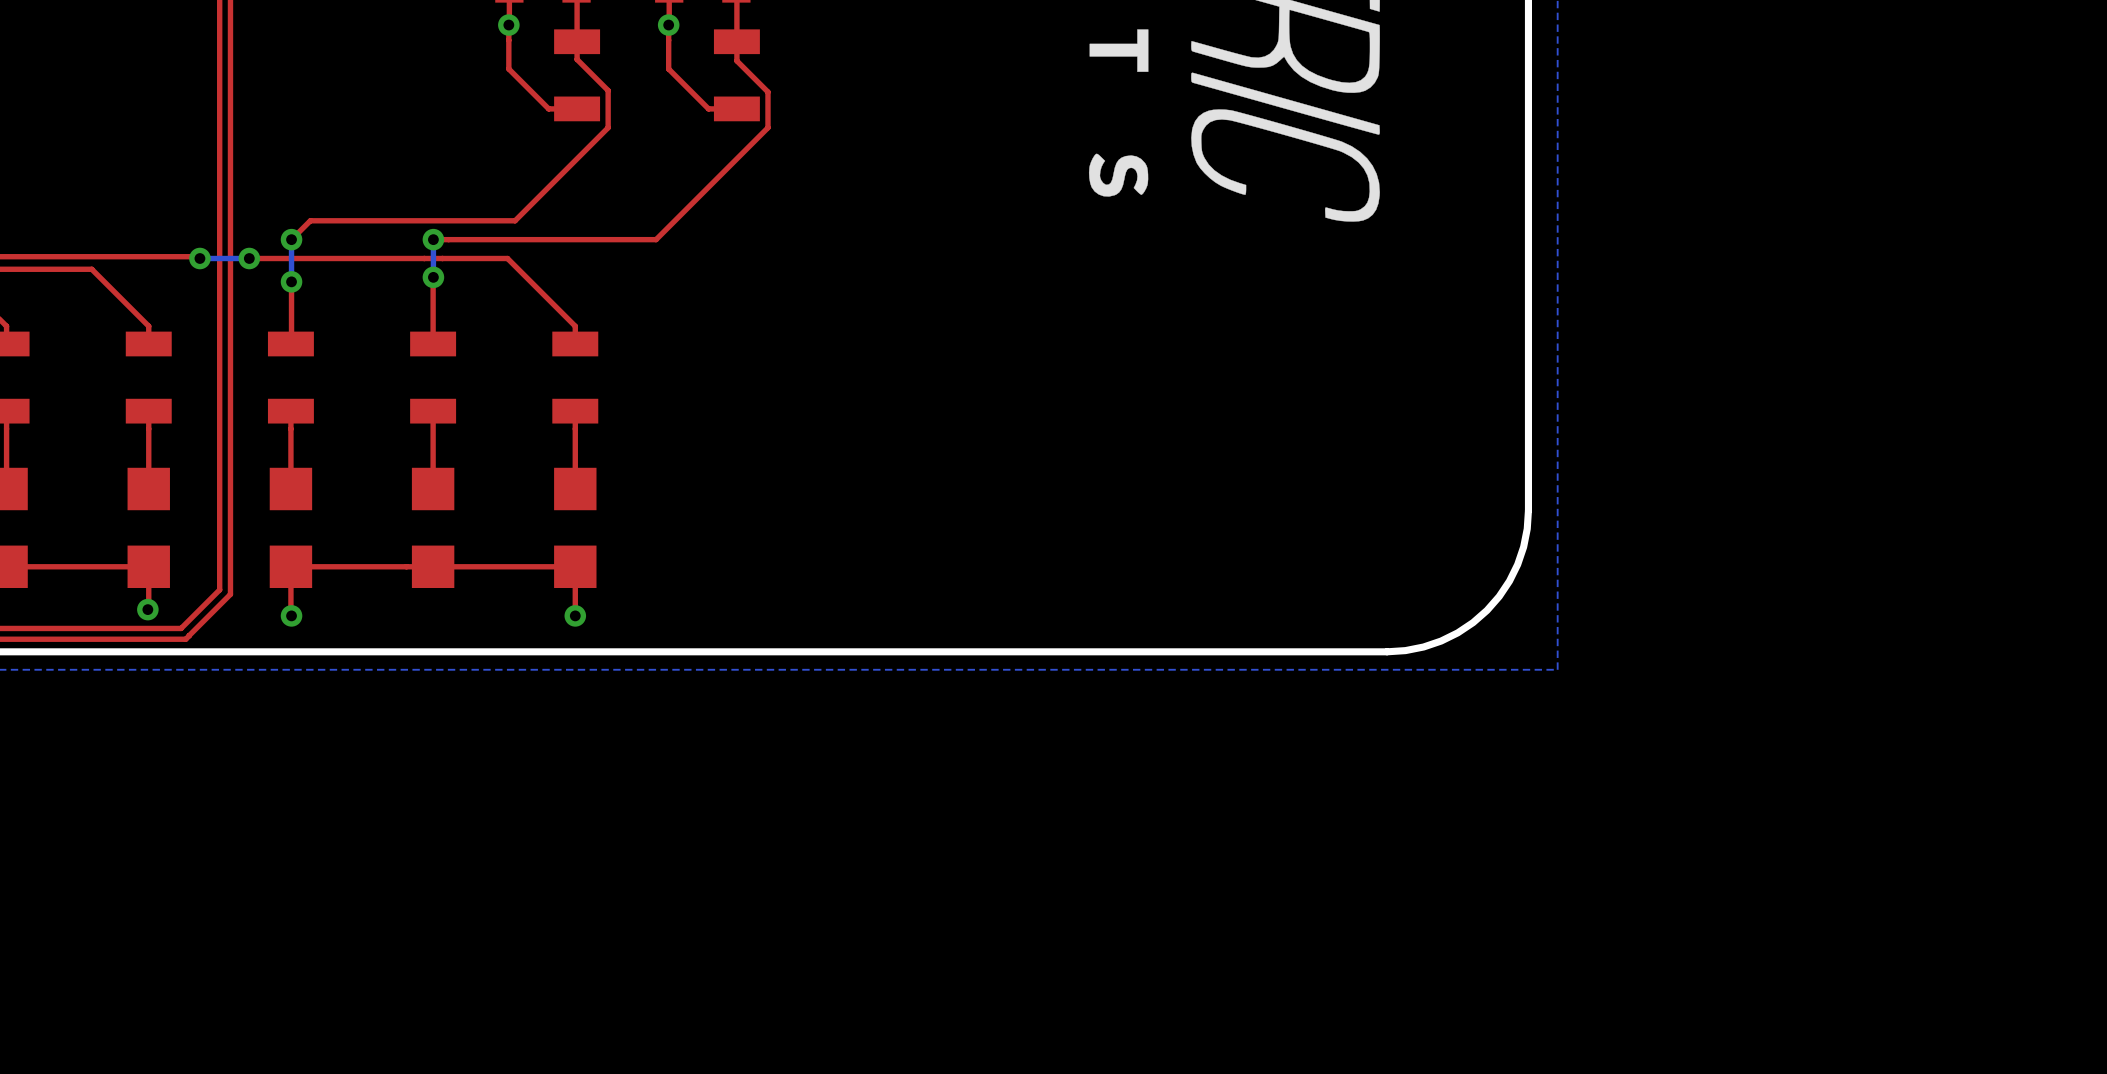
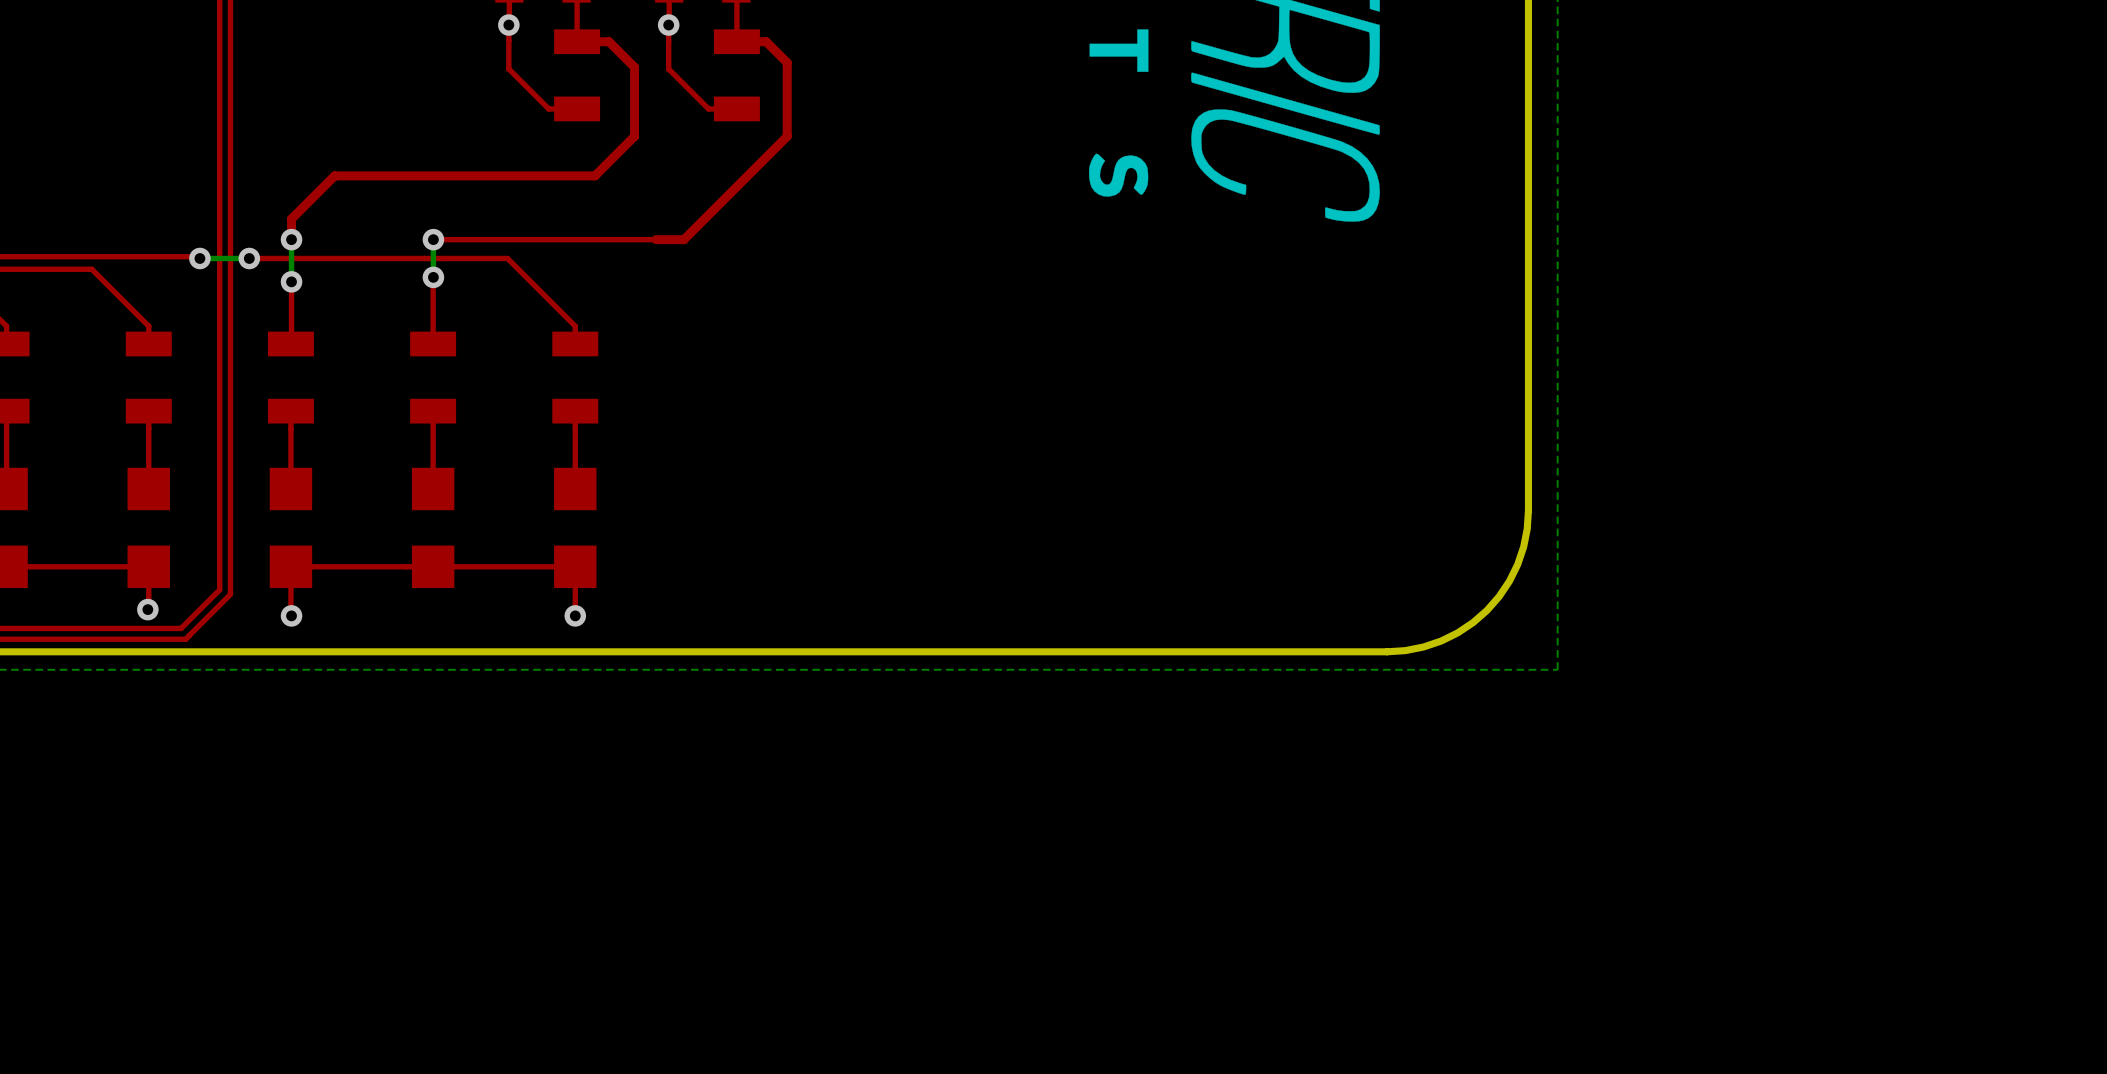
top track: (577, 41) (577, 59) (608, 90) (608, 127) (515, 220) (310, 220) (291, 239) -> (577, 41) (609, 41) (634, 67) (634, 136) (595, 175) (334, 175) (291, 218) (291, 239)
top track: (736, 41) (736, 60) (767, 92) (767, 127) (656, 239) -> (736, 41) (766, 41) (787, 62) (787, 136) (683, 239) (656, 239)

